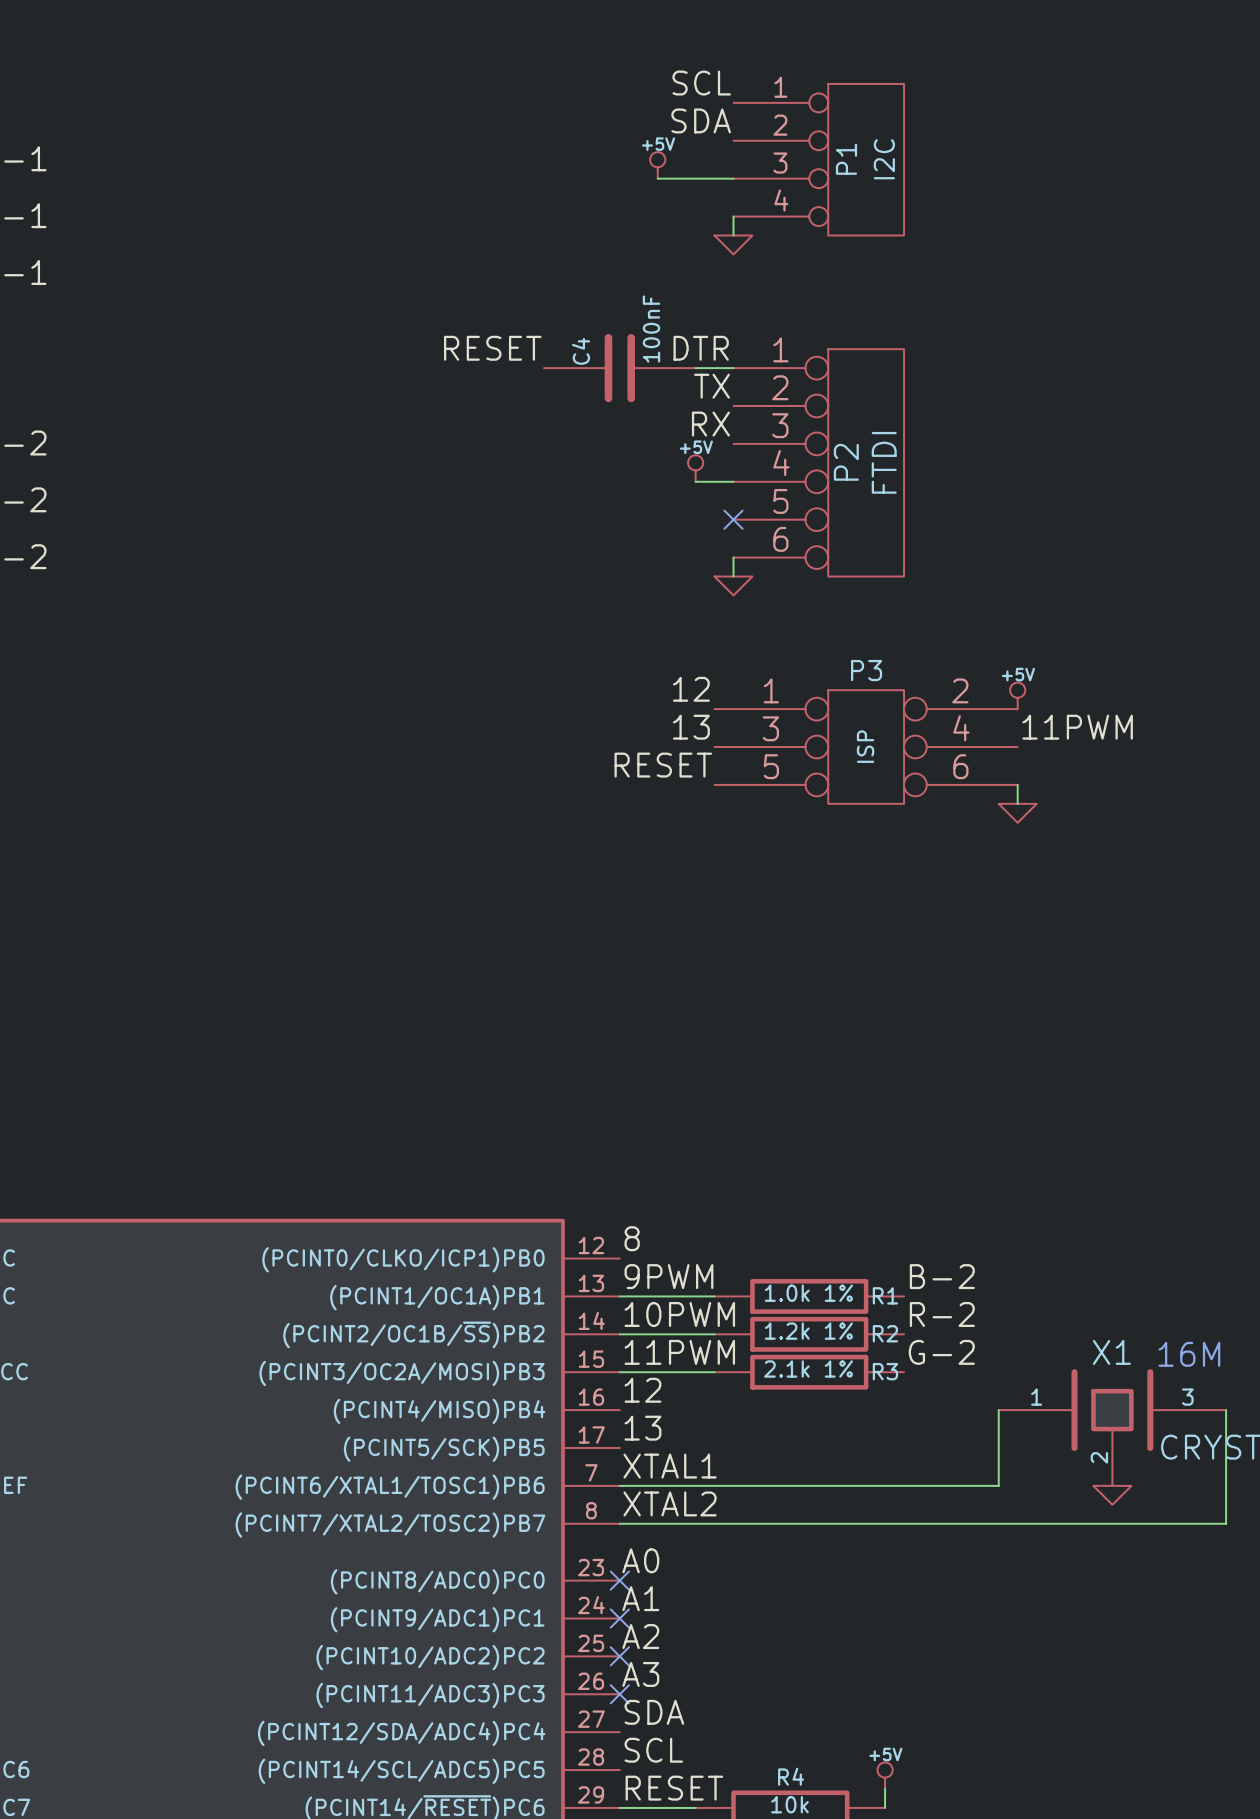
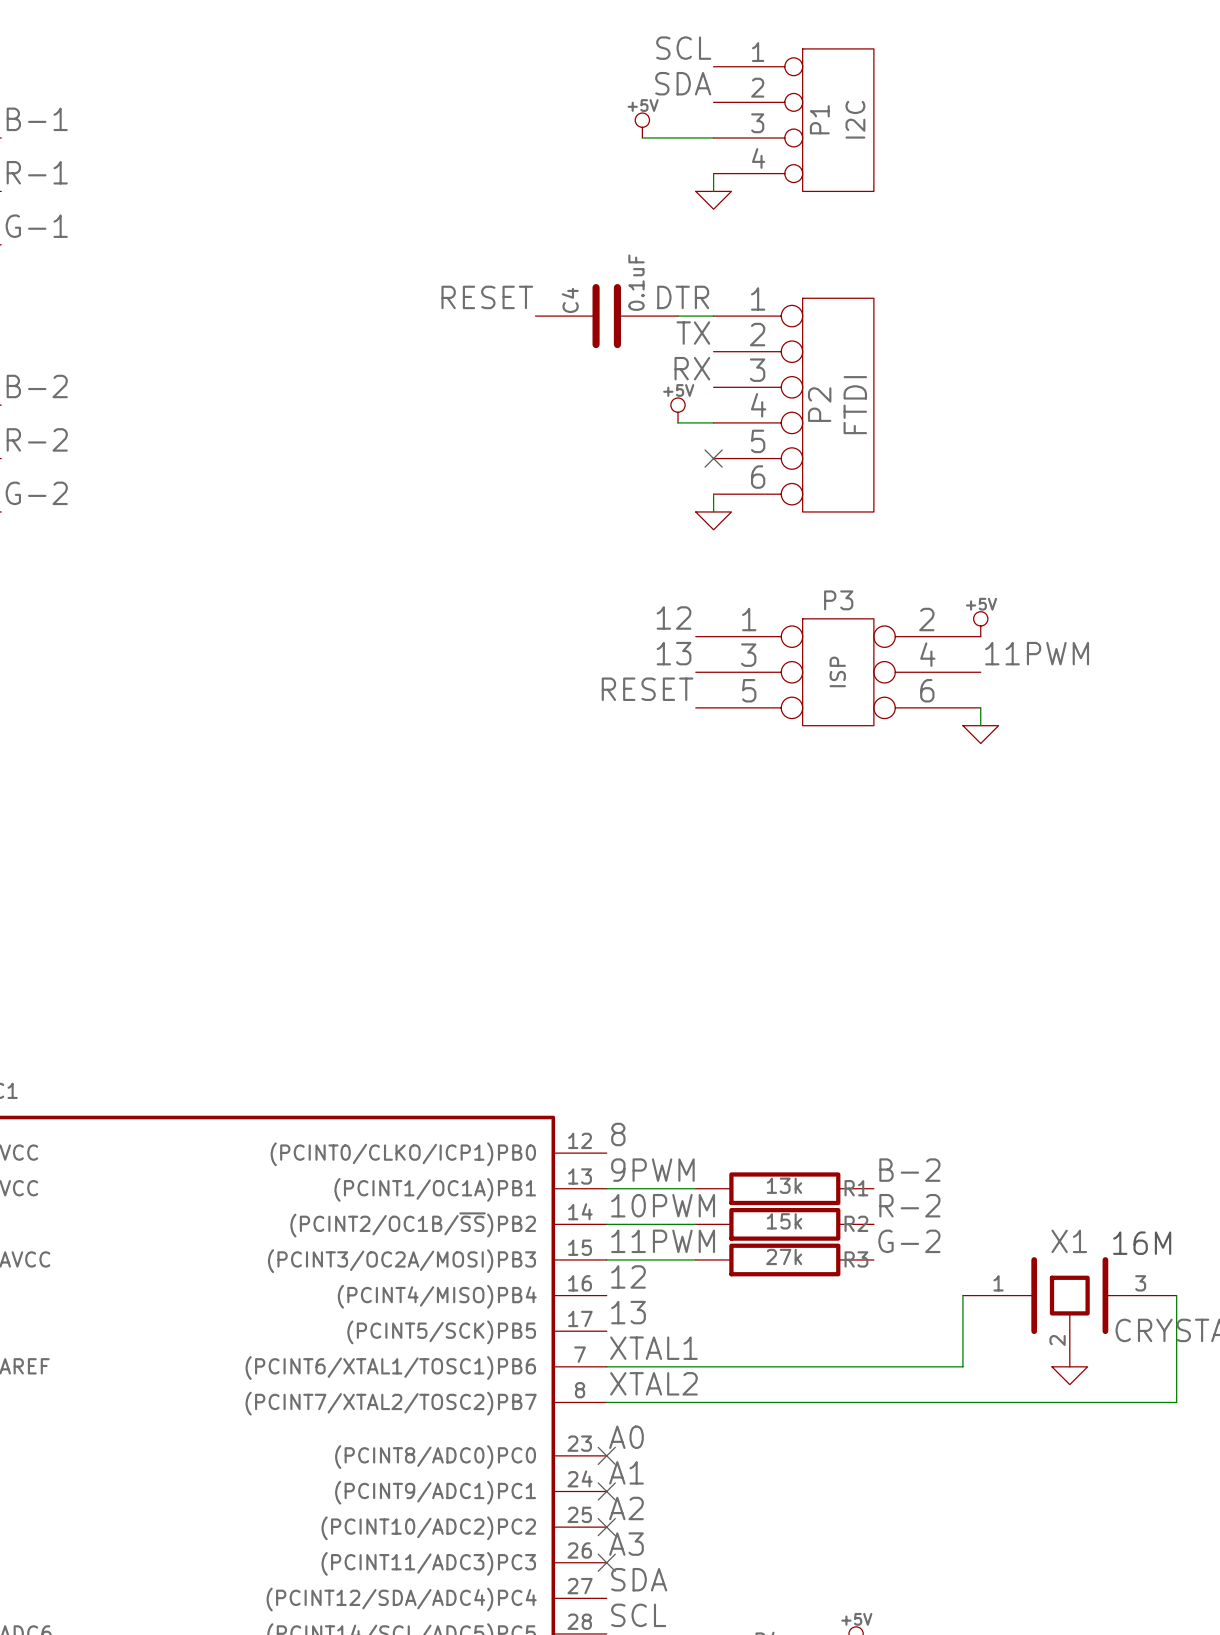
C4 value: 100nF (651, 328) -> 0.1uF (636, 282)
R1 value: 1.0k 1% (808, 1293) -> 13k (784, 1185)
R2 value: 1.2k 1% (808, 1331) -> 15k (784, 1221)
R3 value: 2.1k 1% (808, 1368) -> 27k (784, 1256)

